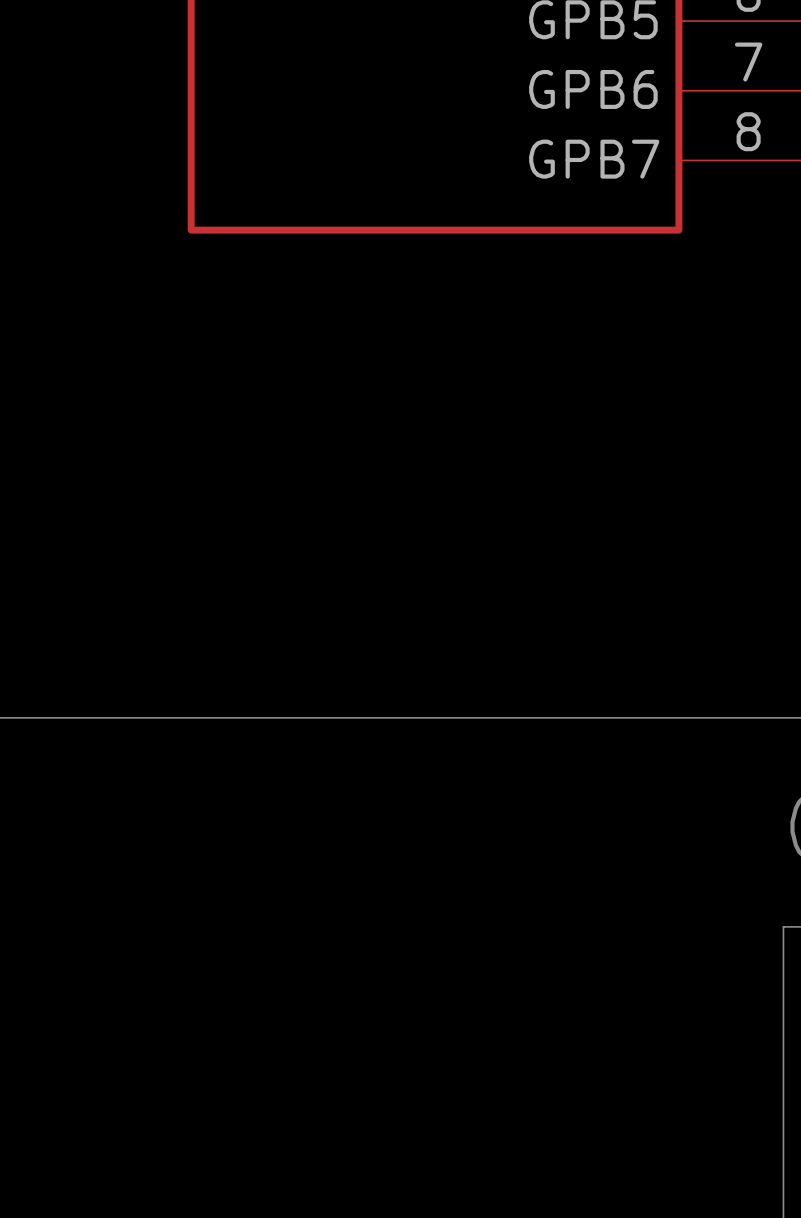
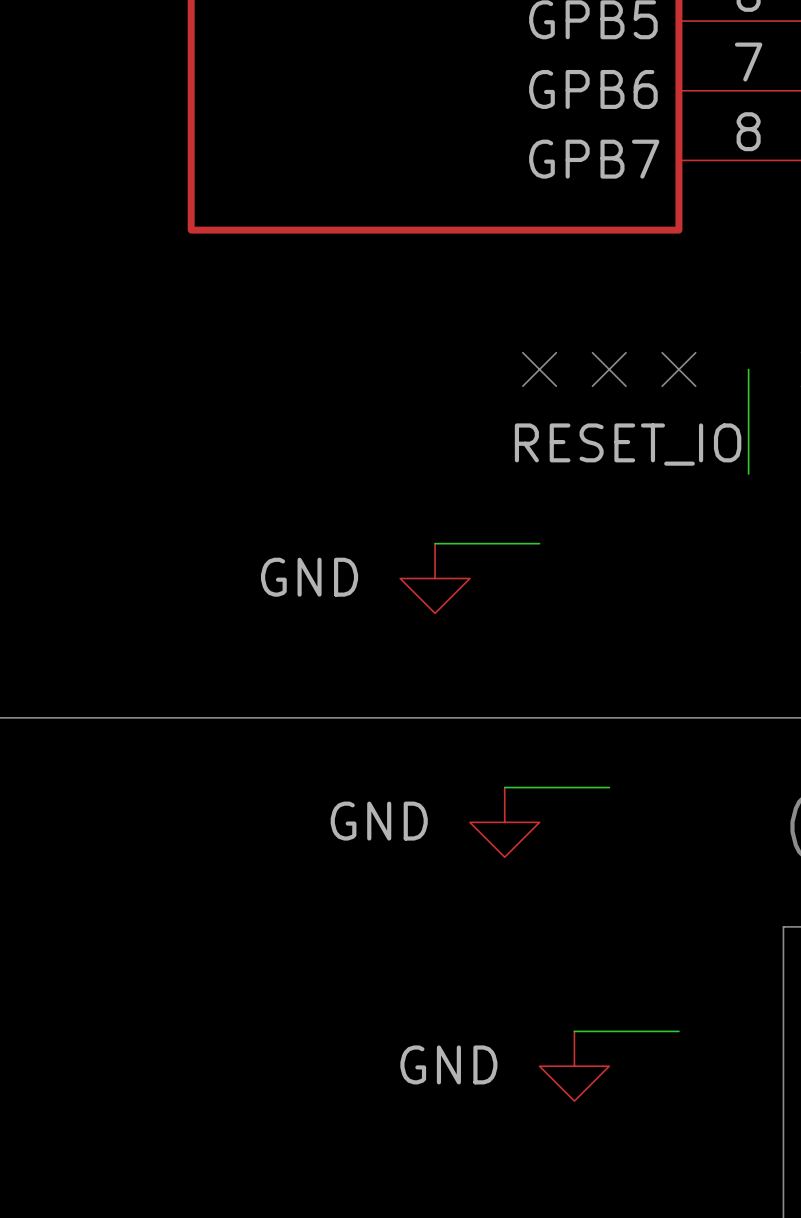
no-connect mark: none -> (539, 369)
no-connect mark: none -> (609, 369)
no-connect mark: none -> (678, 369)
wire: none -> (748, 369) (748, 473)
label: none -> RESET_IO (628, 444)
wire: none -> (435, 543) (539, 543)
power symbol: none -> GND (435, 578)
wire: none -> (504, 787) (609, 787)
power symbol: none -> GND (504, 822)
wire: none -> (574, 1031) (678, 1031)
power symbol: none -> GND (574, 1066)

